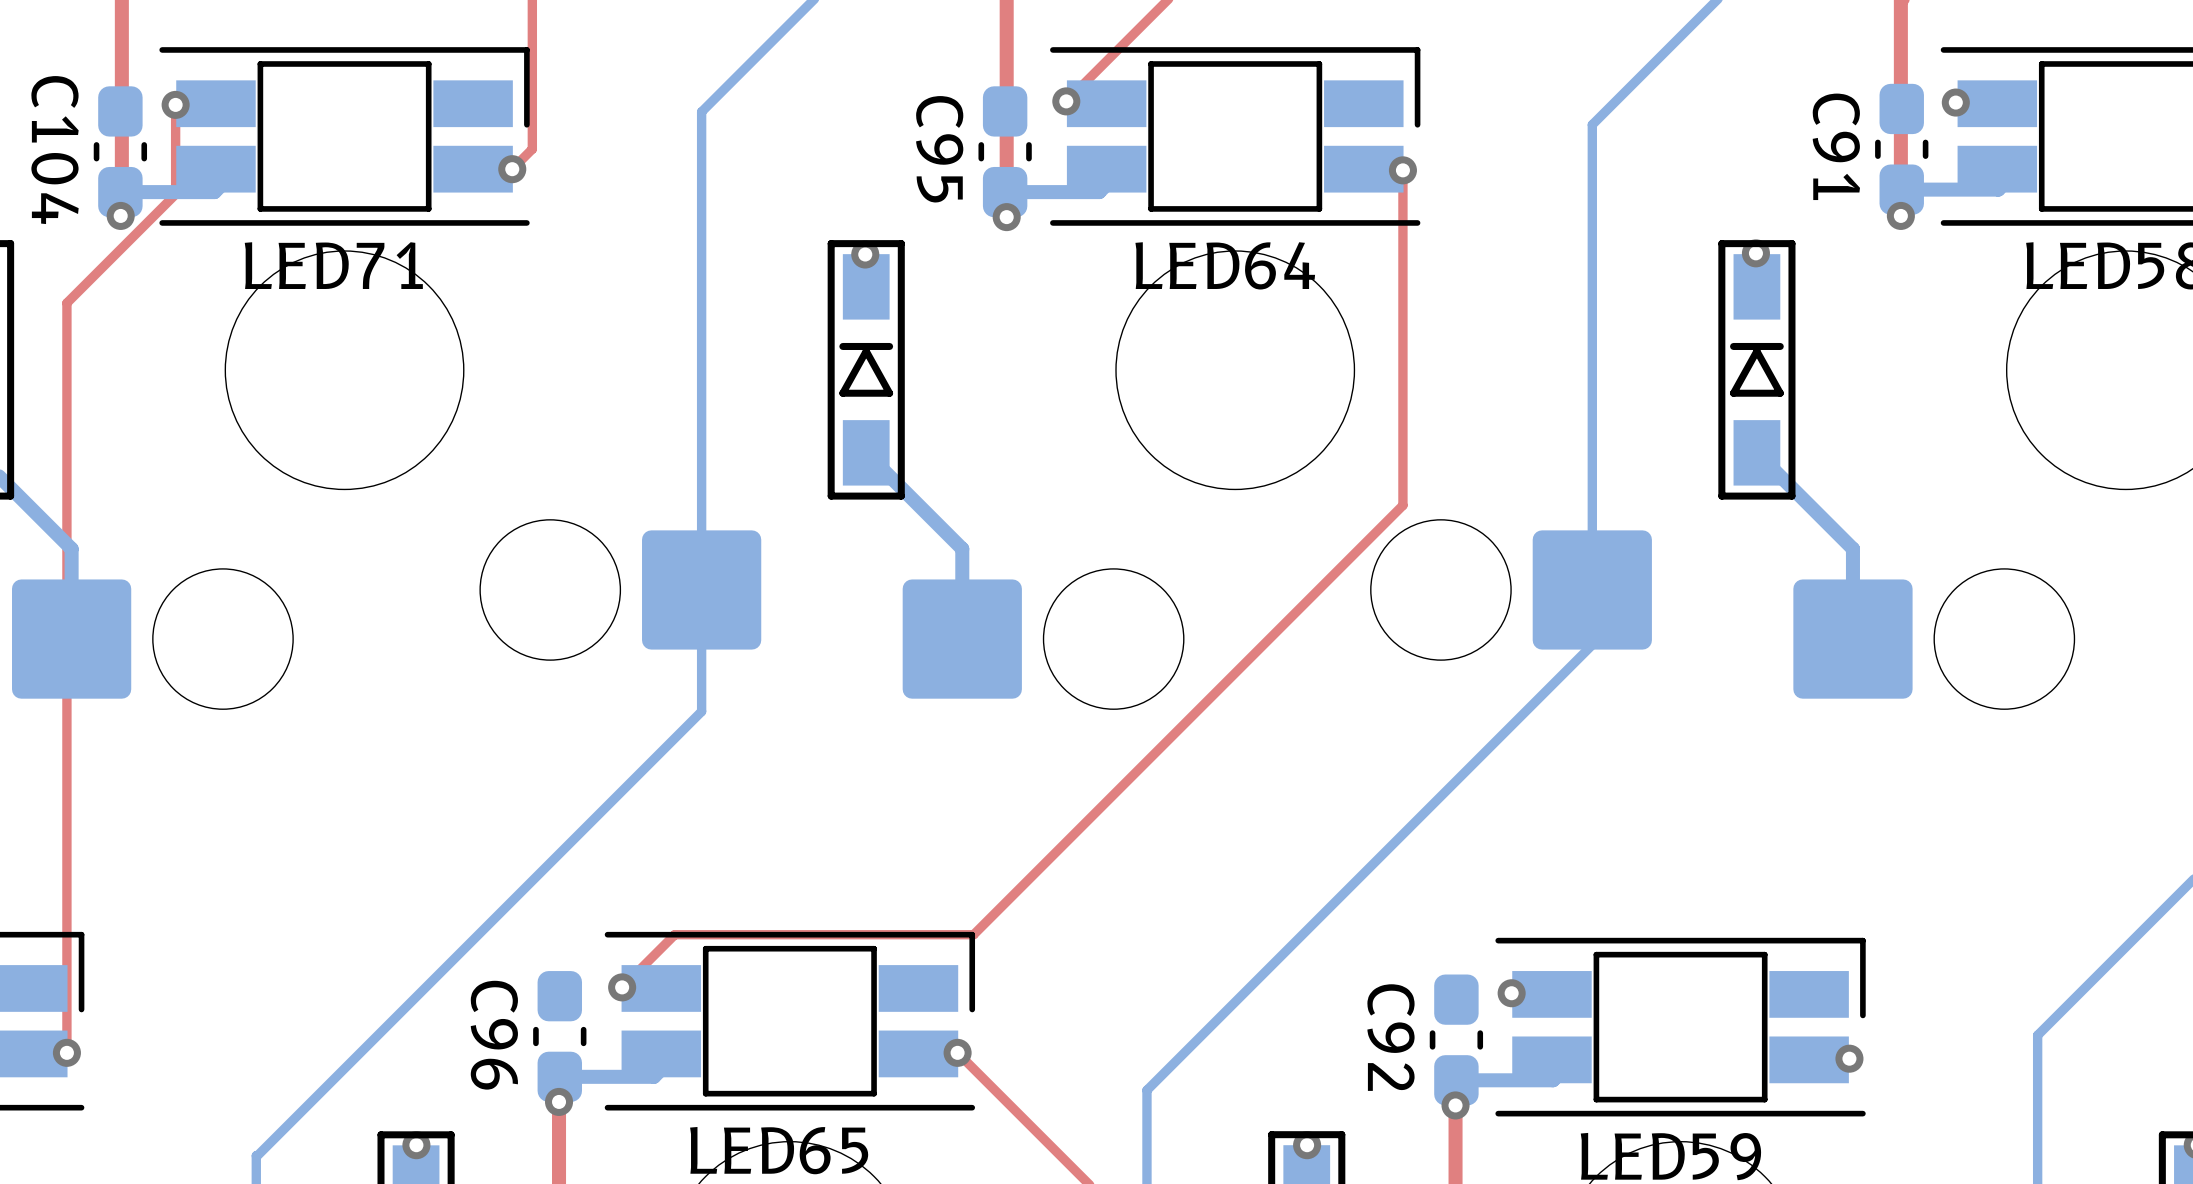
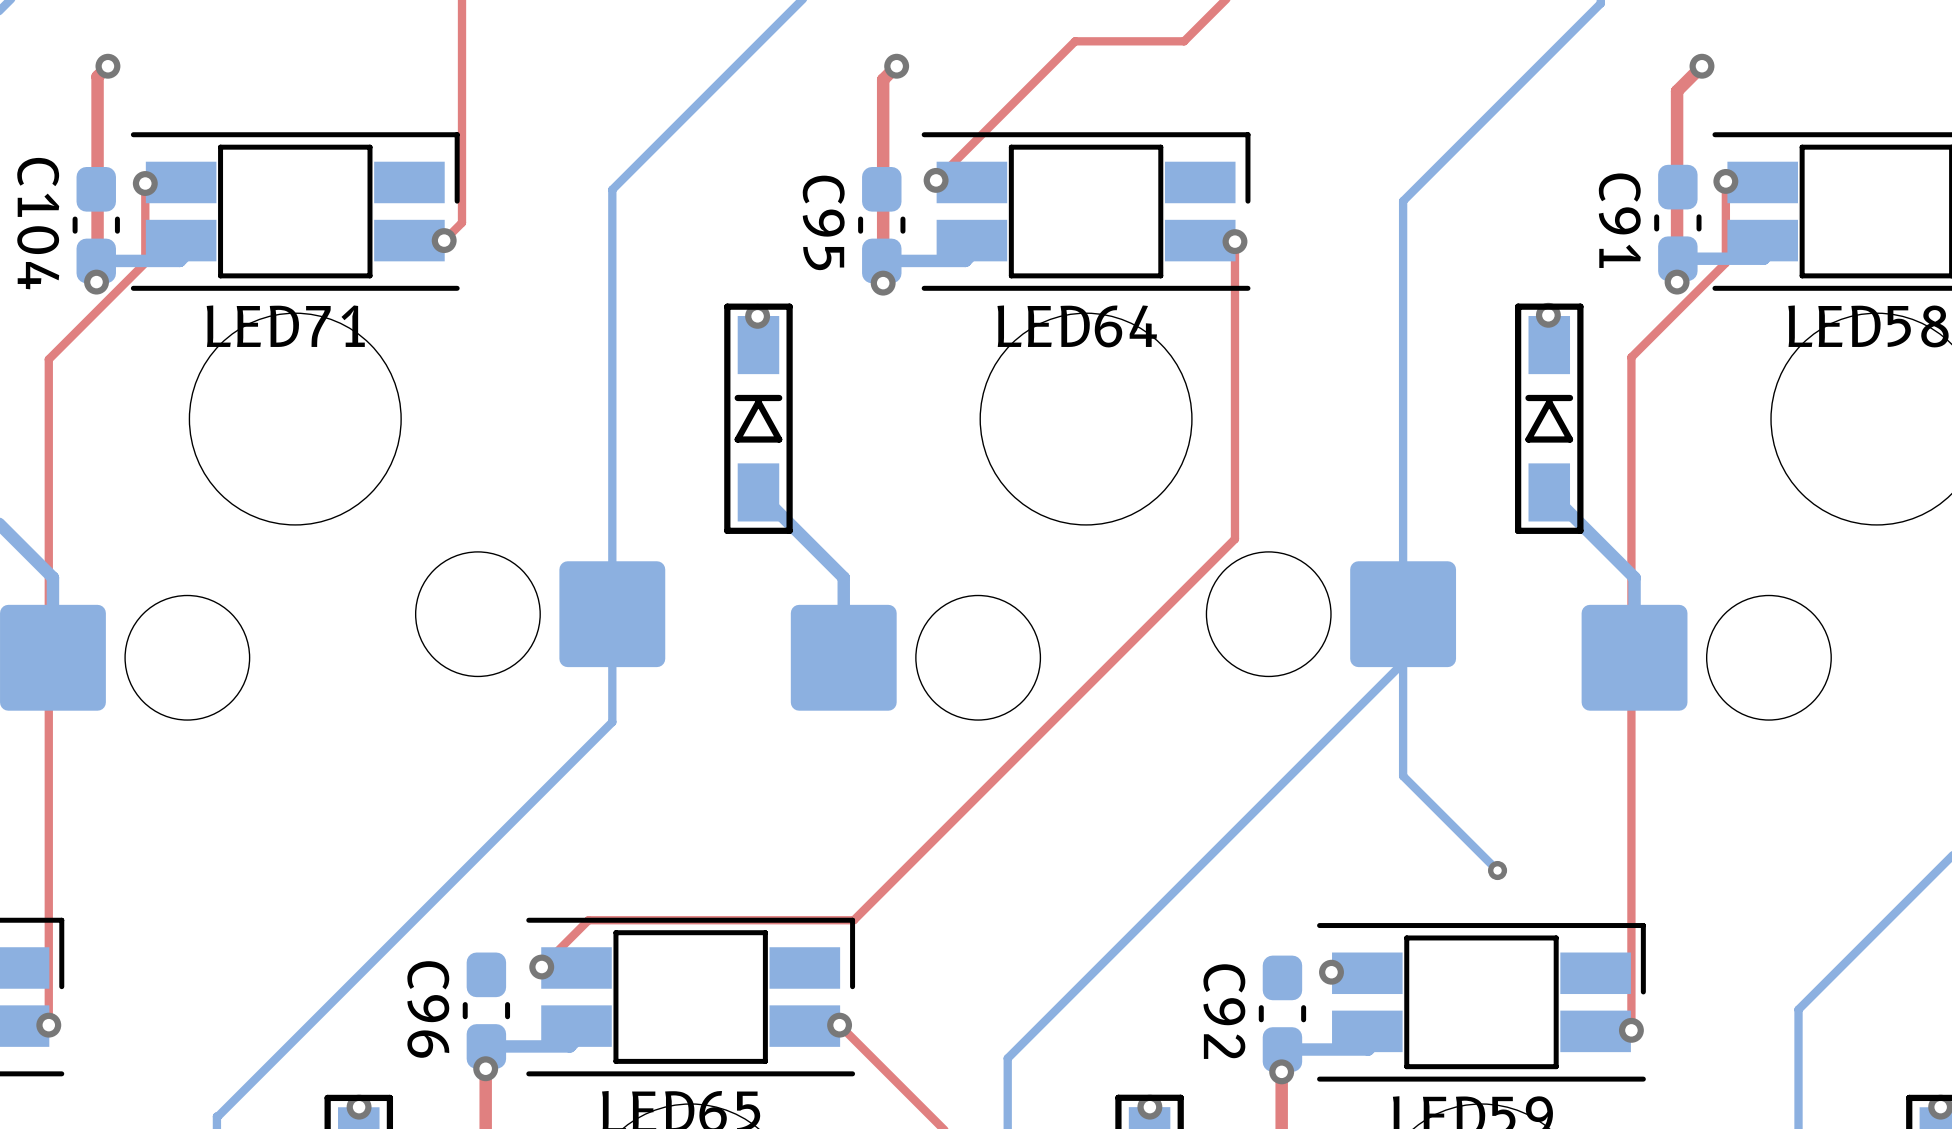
top track: none -> (1725, 181) (1725, 262) (1631, 357) (1631, 1030)
bottom track: none -> (1403, 662) (1403, 776) (1497, 870)
via: none -> (1497, 870)

